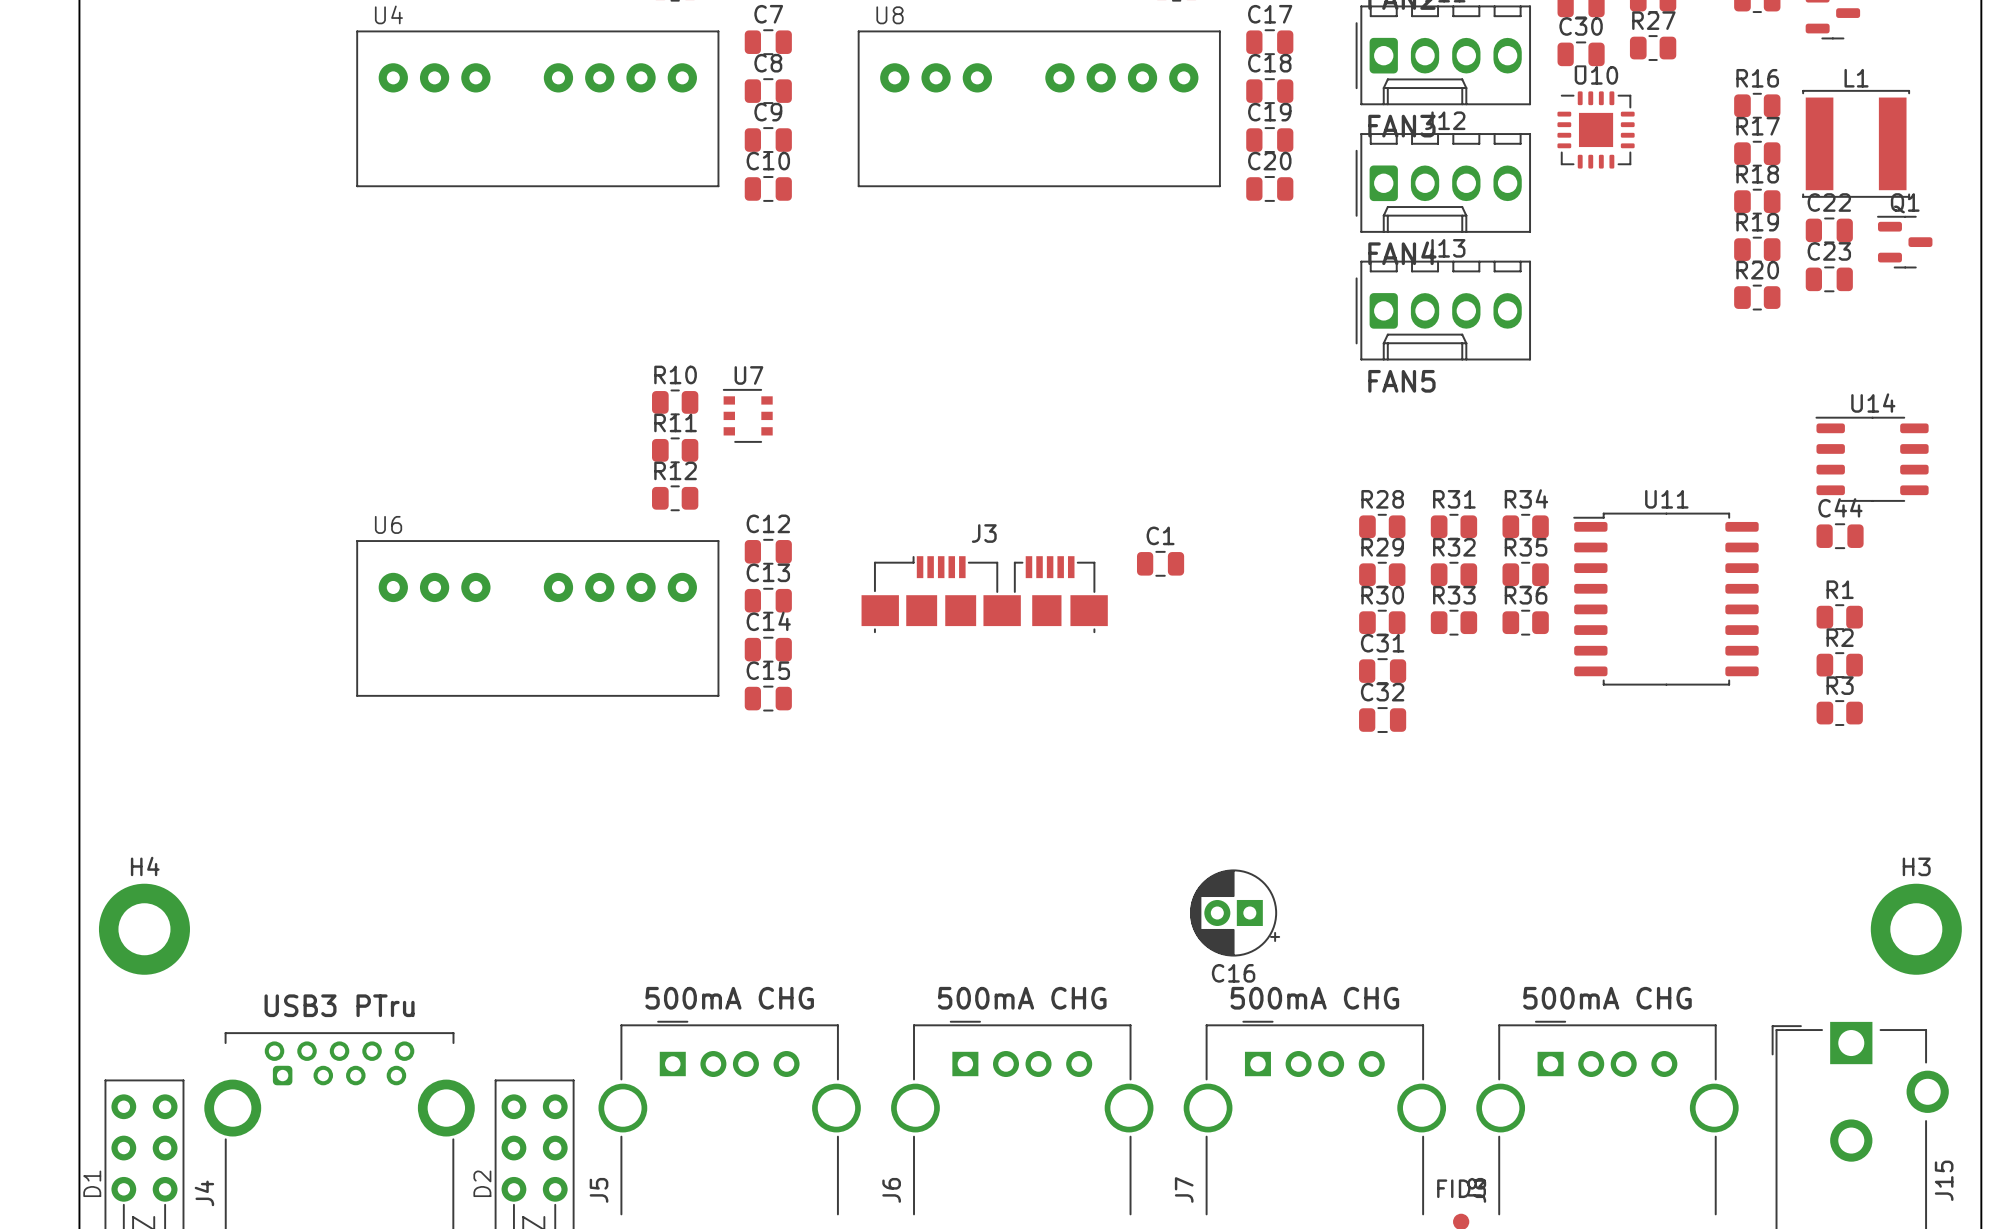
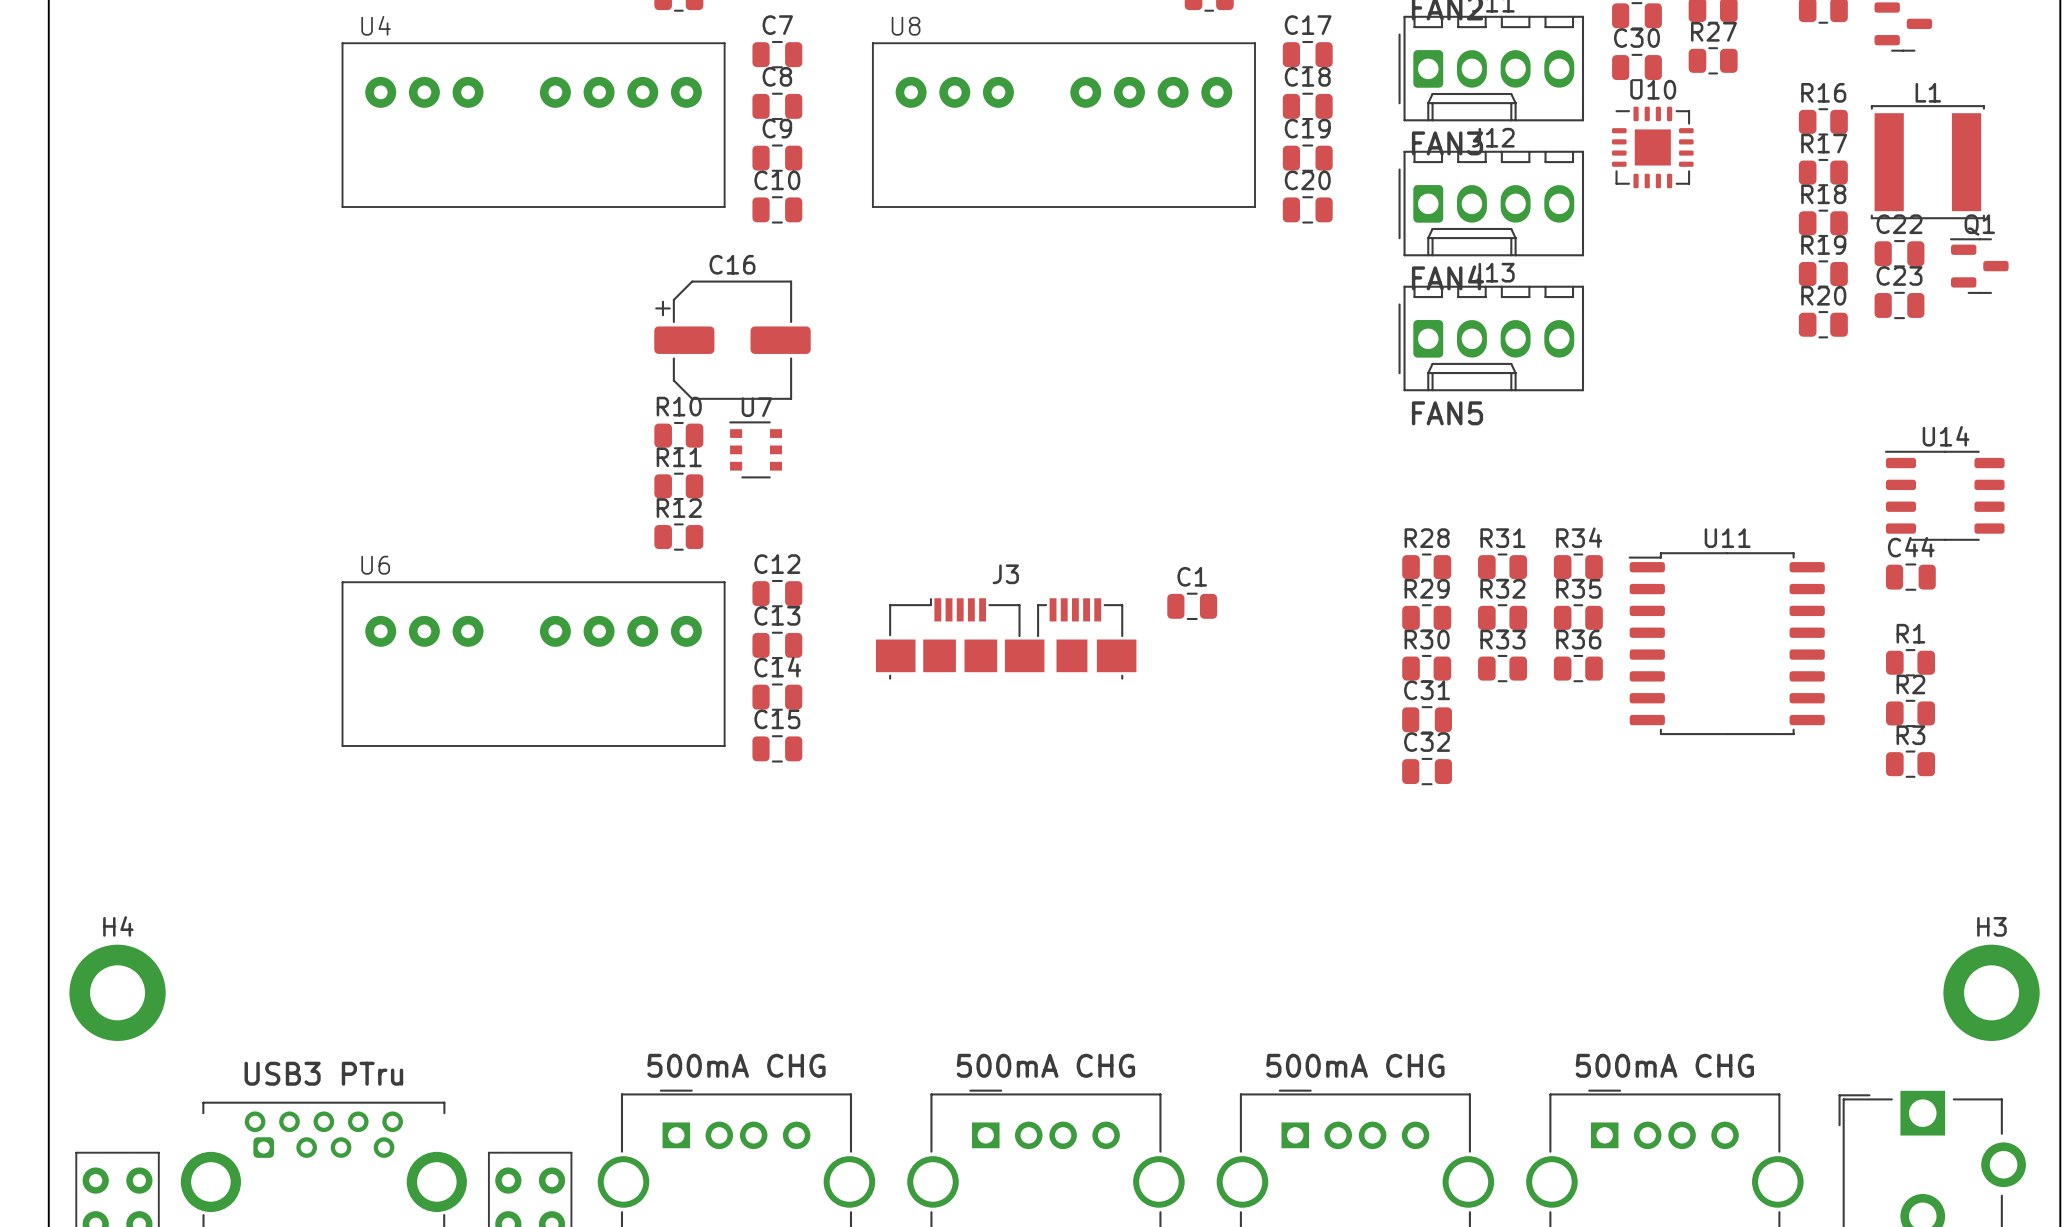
C16 footprint: [1190, 869, 1281, 957] -> [654, 280, 811, 400]
C16 name position: C16 (1233, 973) -> C16 (732, 264)

